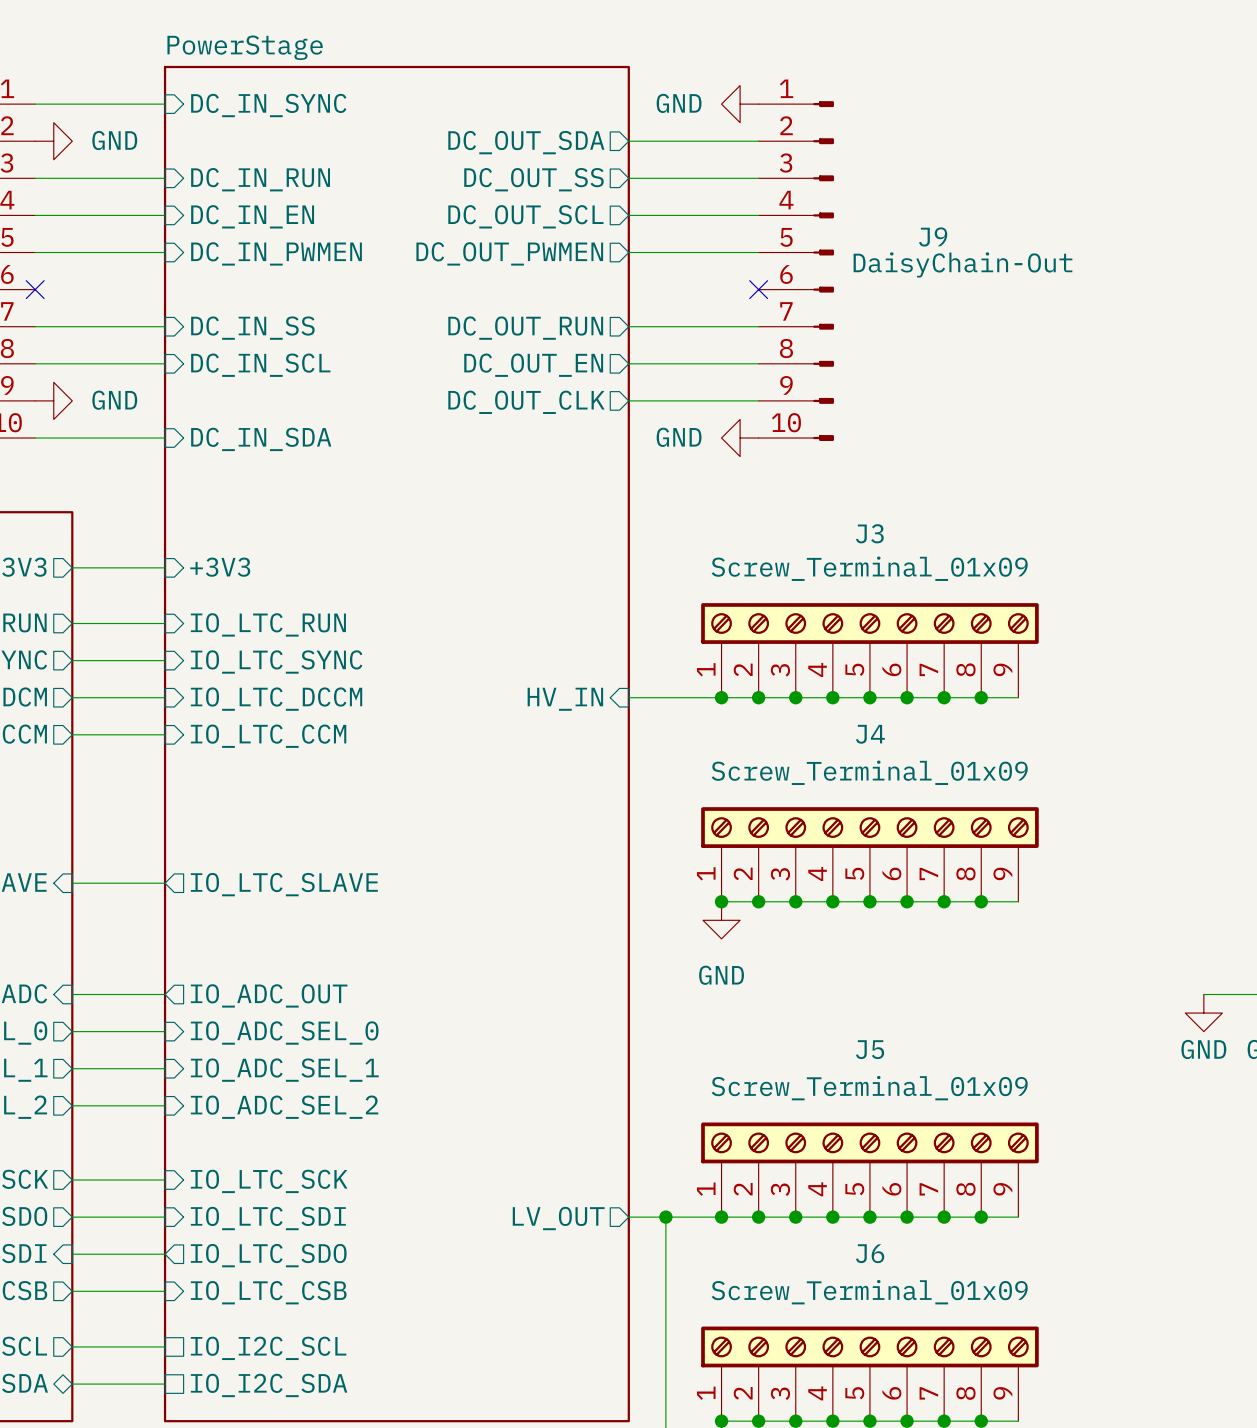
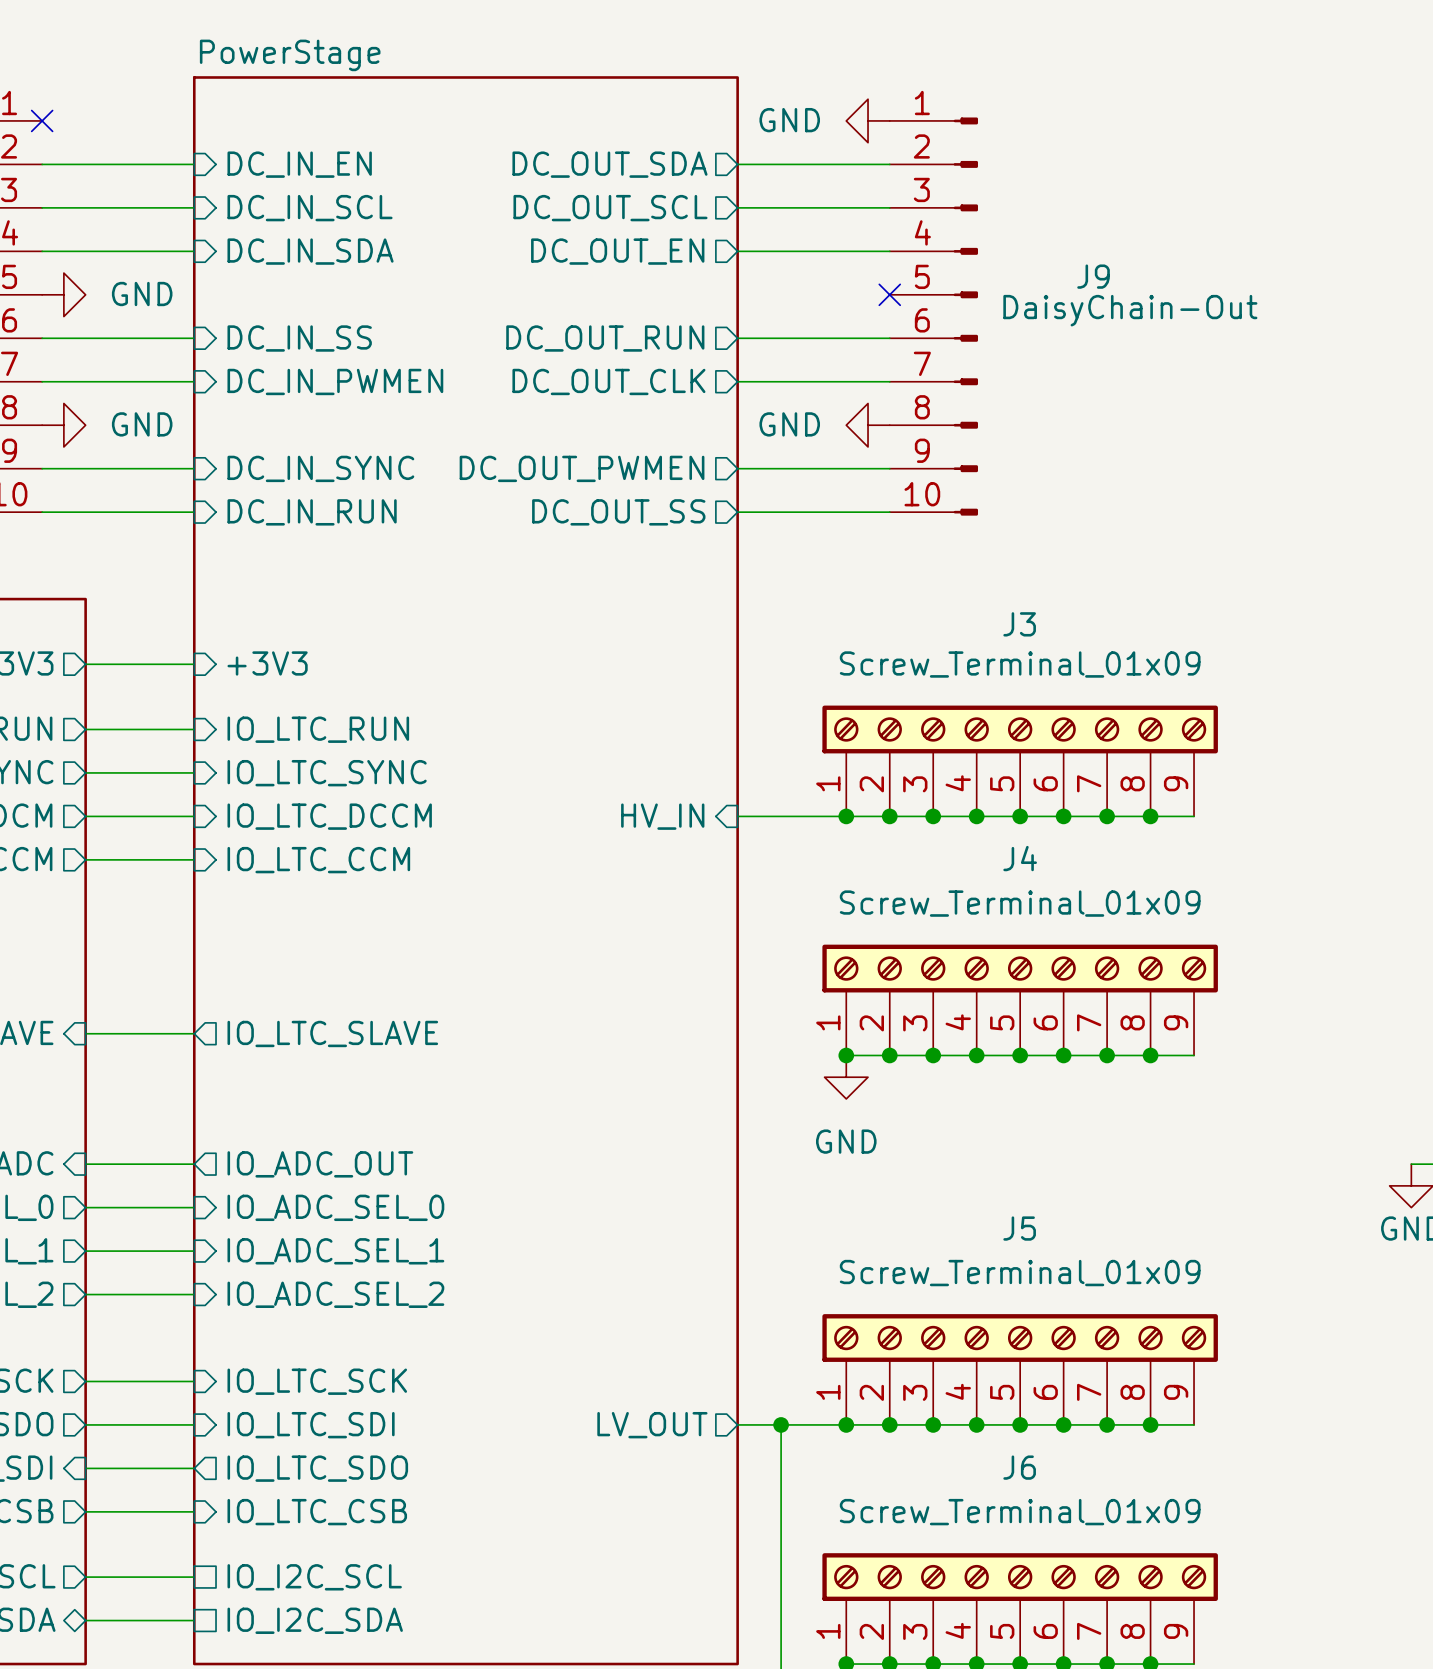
wire: (35, 104) (165, 104) -> (42, 164) (194, 164)
no-connect mark: none -> (42, 120)
sheet pin position: DC_IN_SYNC (268, 105) -> DC_IN_SYNC (320, 468)
power symbol: GND (53, 141) -> none
sheet pin: none -> DC_IN_EN (299, 164)
sheet pin: DC_IN_RUN (260, 179) -> DC_IN_SCL (310, 208)
sheet pin: DC_OUT_SS (533, 179) -> DC_OUT_SCL (610, 208)
sheet pin: DC_IN_EN (252, 216) -> DC_IN_SDA (310, 251)
sheet pin: DC_OUT_SCL (525, 216) -> DC_OUT_EN (617, 251)
wire: (35, 252) (165, 252) -> (42, 338) (194, 338)
power symbol: none -> GND (63, 294)
wire: (628, 252) (758, 252) -> (737, 338) (889, 338)
sheet pin: DC_IN_PWMEN (276, 253) -> DC_IN_SS (299, 338)
sheet pin: DC_OUT_PWMEN (509, 253) -> DC_OUT_RUN (605, 338)
no-connect mark: (35, 289) -> none
no-connect mark position: (758, 289) -> (889, 294)
sheet pin: DC_IN_SS (252, 328) -> DC_IN_PWMEN (335, 381)
sheet pin: DC_OUT_RUN (525, 328) -> DC_OUT_CLK (608, 381)
wire: (35, 363) (165, 363) -> (42, 468) (194, 468)
wire: (628, 363) (758, 363) -> (737, 512) (889, 512)
sheet pin: DC_IN_SCL (260, 365) -> none
sheet pin: DC_OUT_EN (533, 365) -> none
power symbol position: GND (53, 400) -> GND (63, 425)
sheet pin: DC_OUT_CLK (526, 402) -> DC_OUT_PWMEN (582, 468)
power symbol position: GND (740, 438) -> GND (868, 425)
sheet pin: DC_IN_SDA (261, 439) -> DC_IN_RUN (312, 512)
sheet pin: none -> DC_OUT_SS (618, 512)

